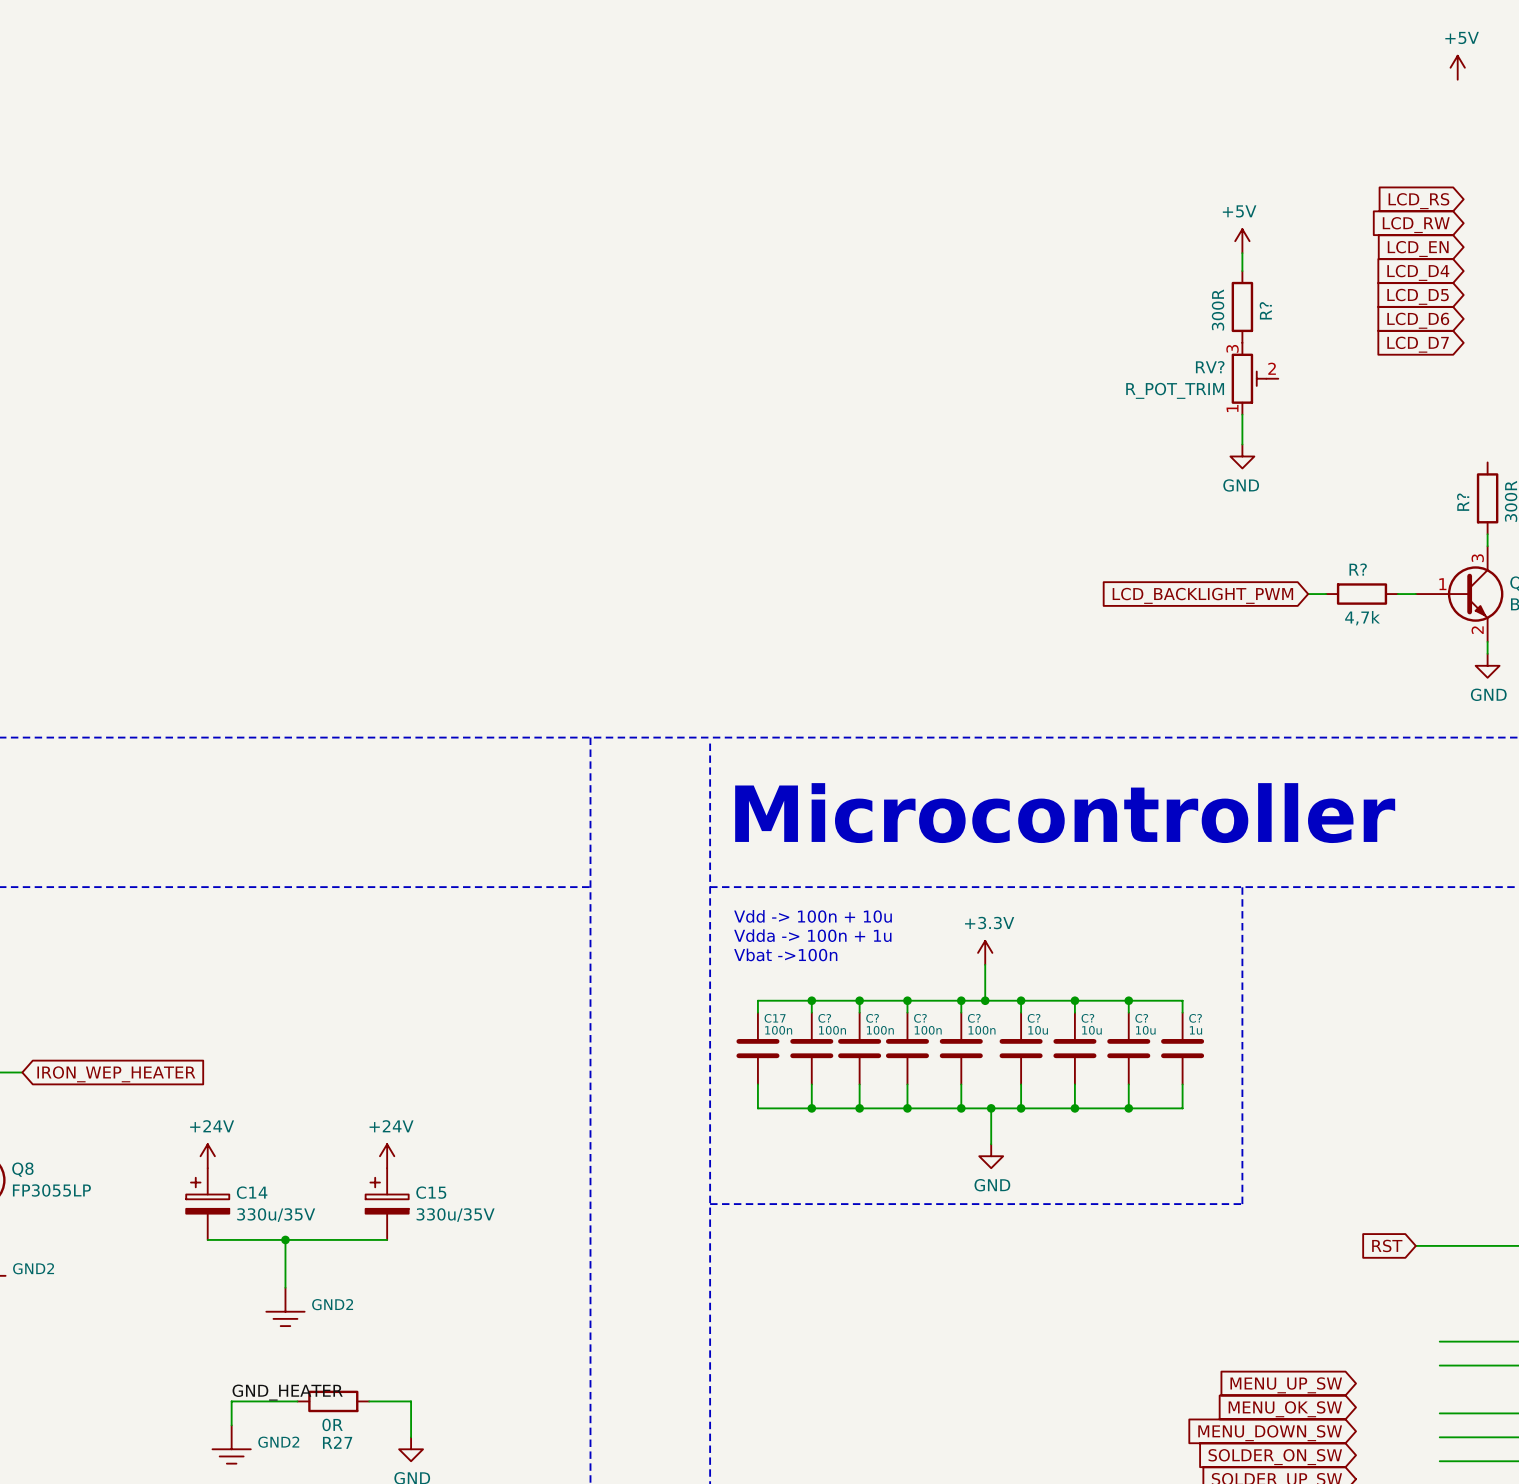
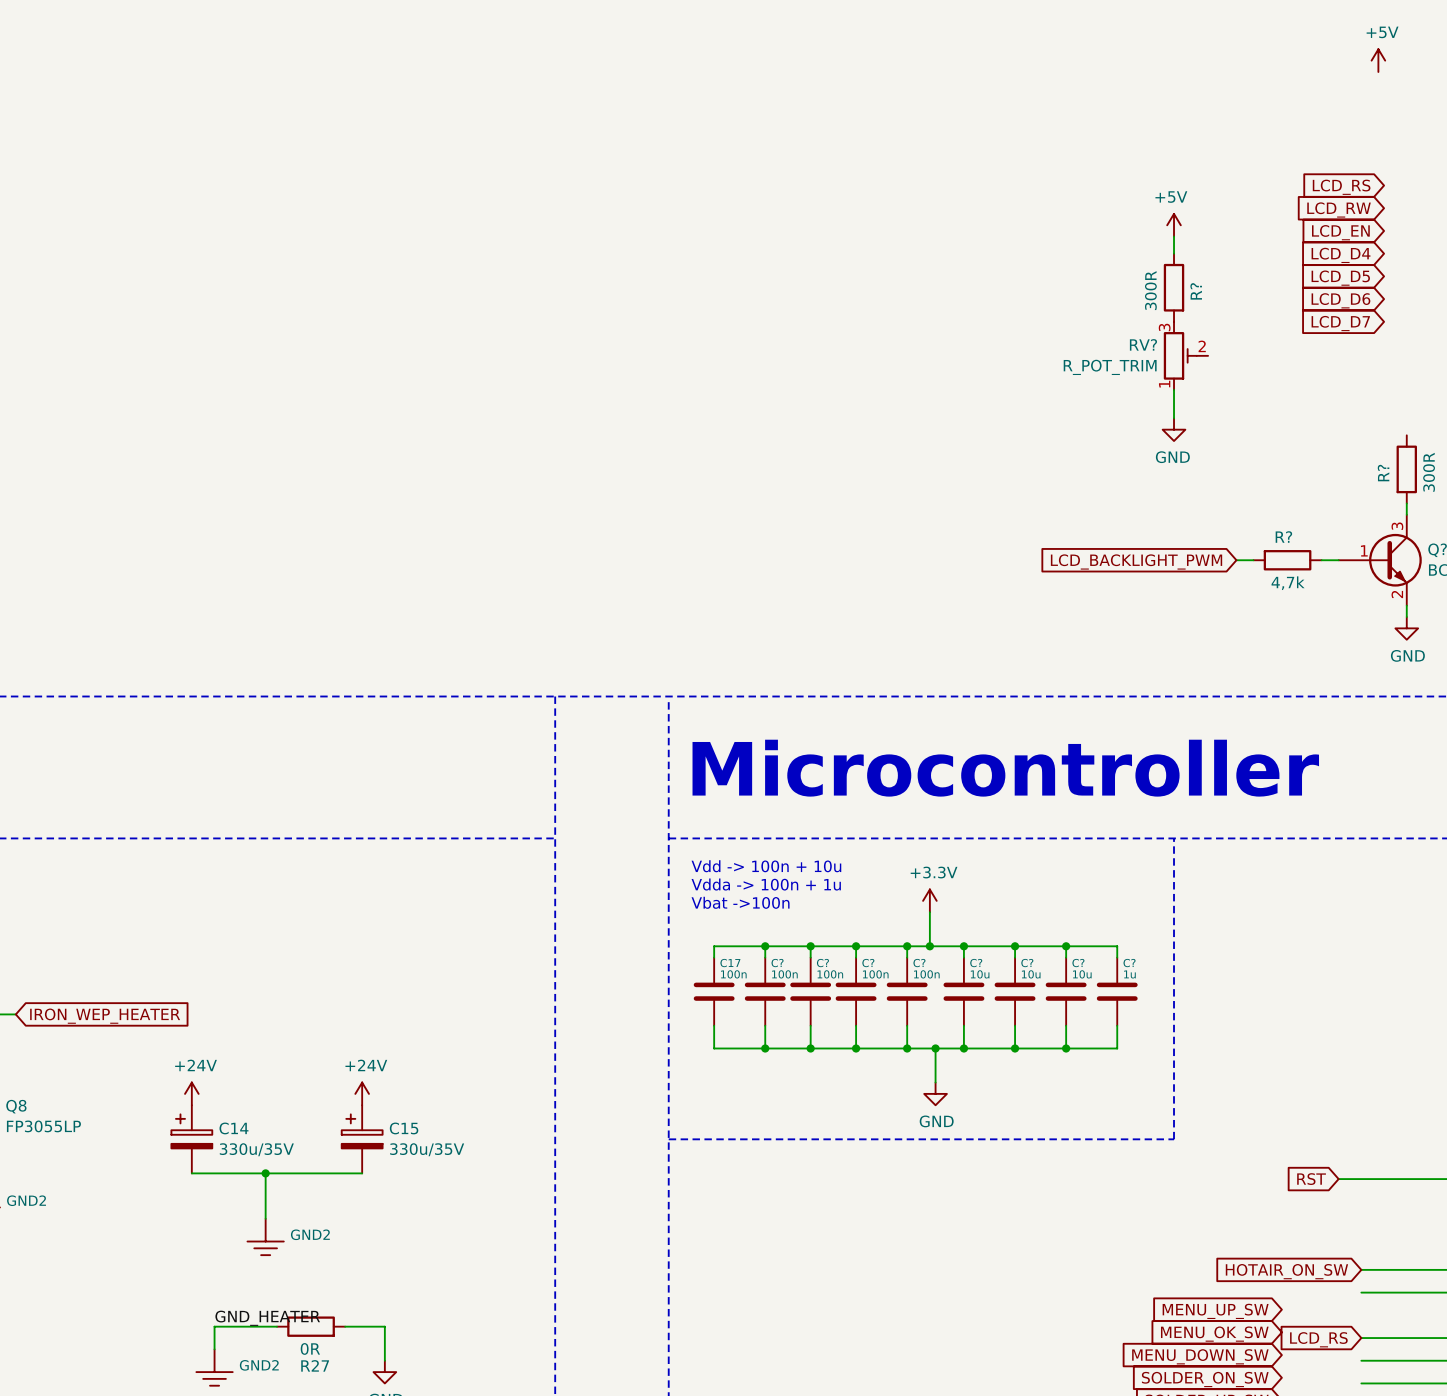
global label: none -> HOTAIR_ON_SW (1286, 1271)
global label: none -> LCD_RS (1318, 1339)

